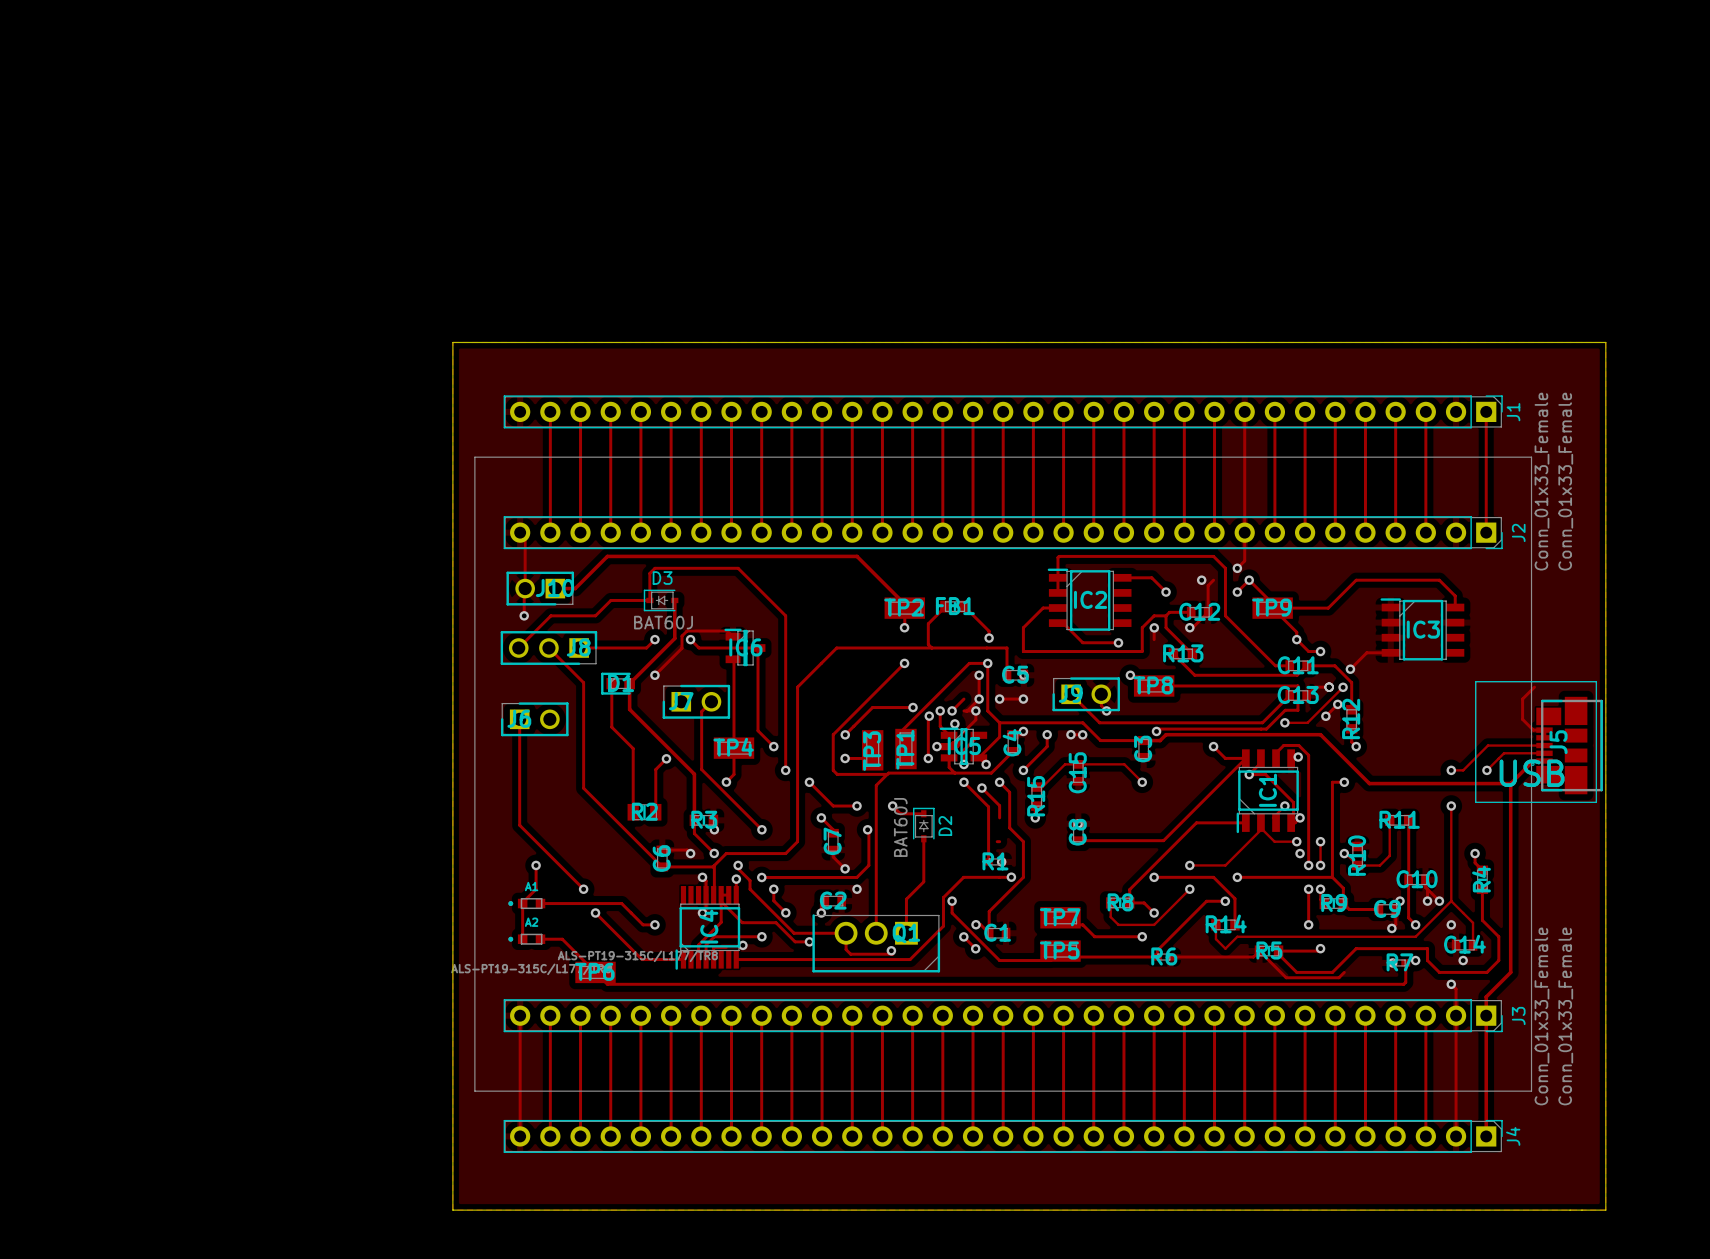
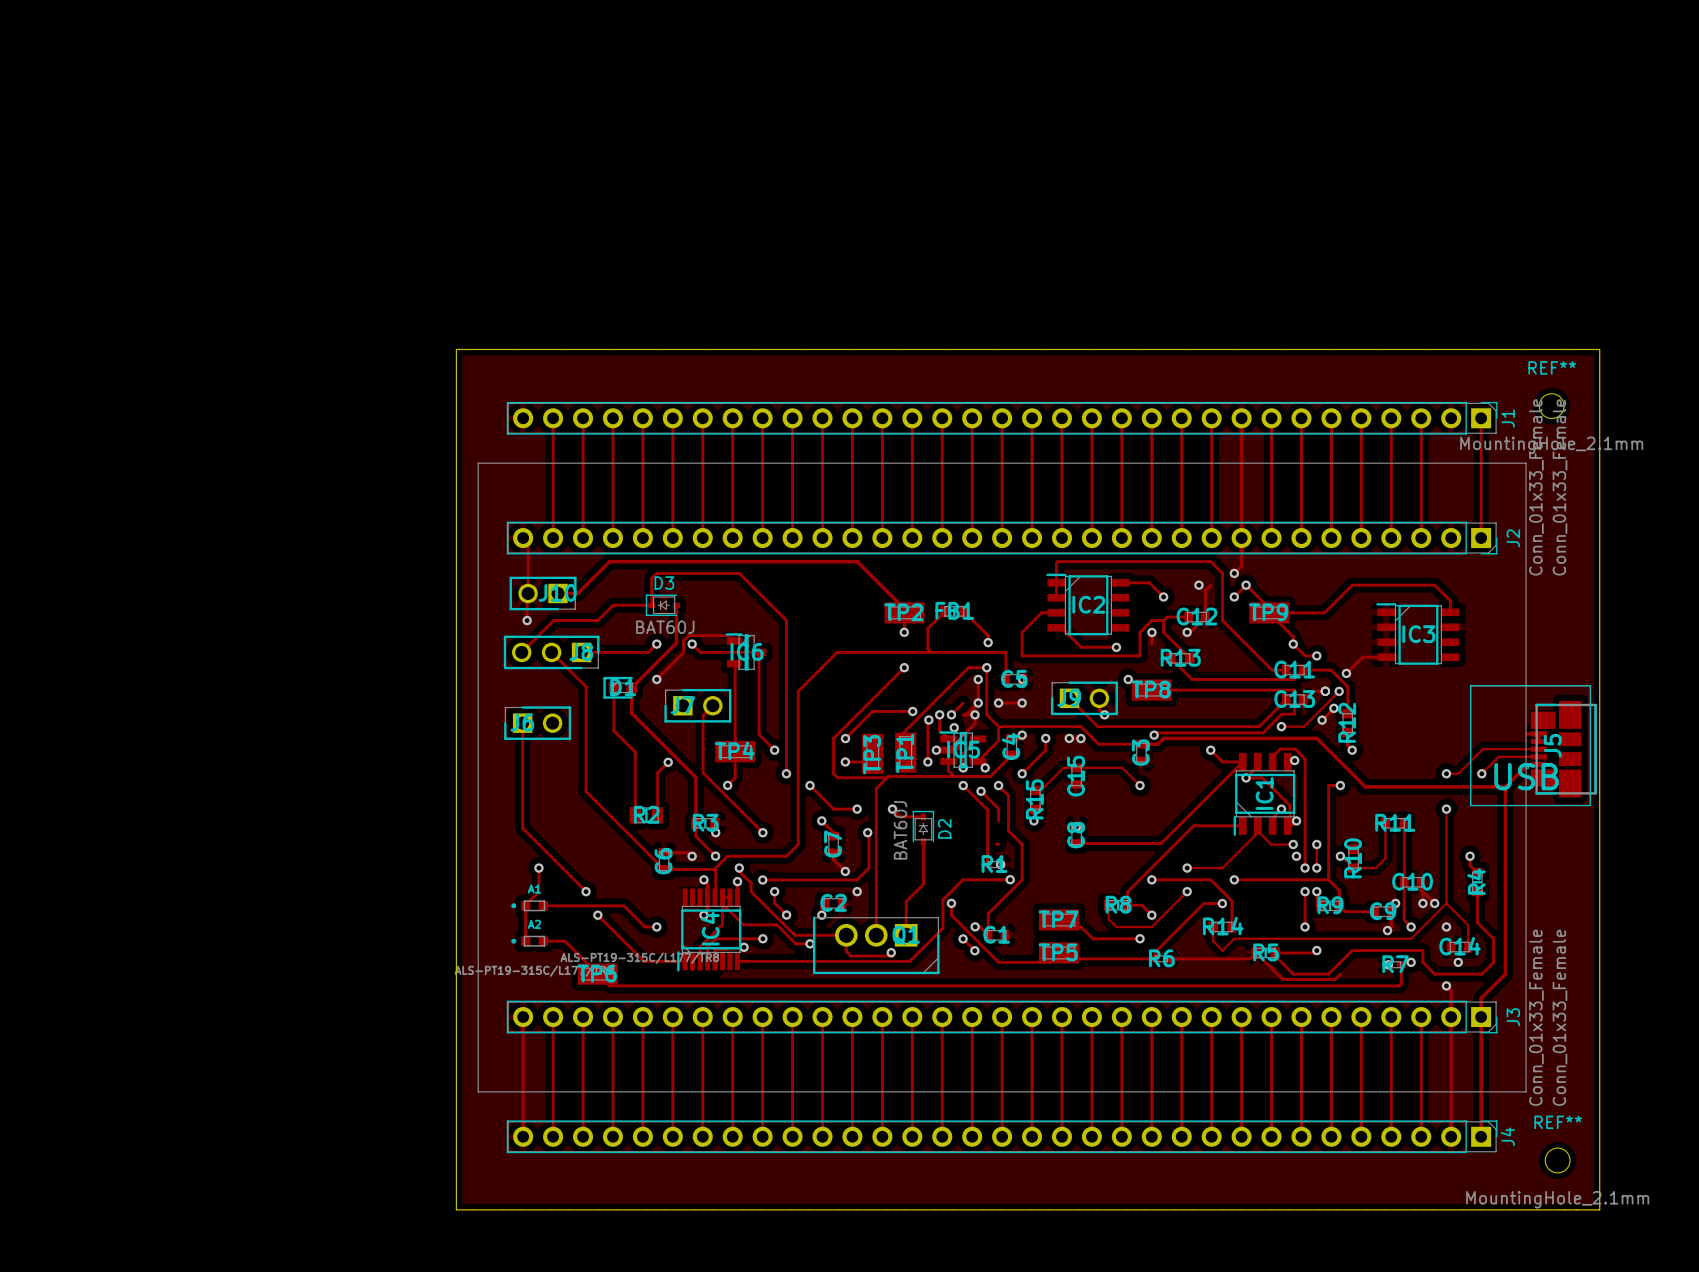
REF**: none -> MountingHole_2.1mm (1551, 406)
track: (1534, 687) (1522, 699) (1522, 719) (1533, 730) -> none
REF**: none -> MountingHole_2.1mm (1557, 1160)

